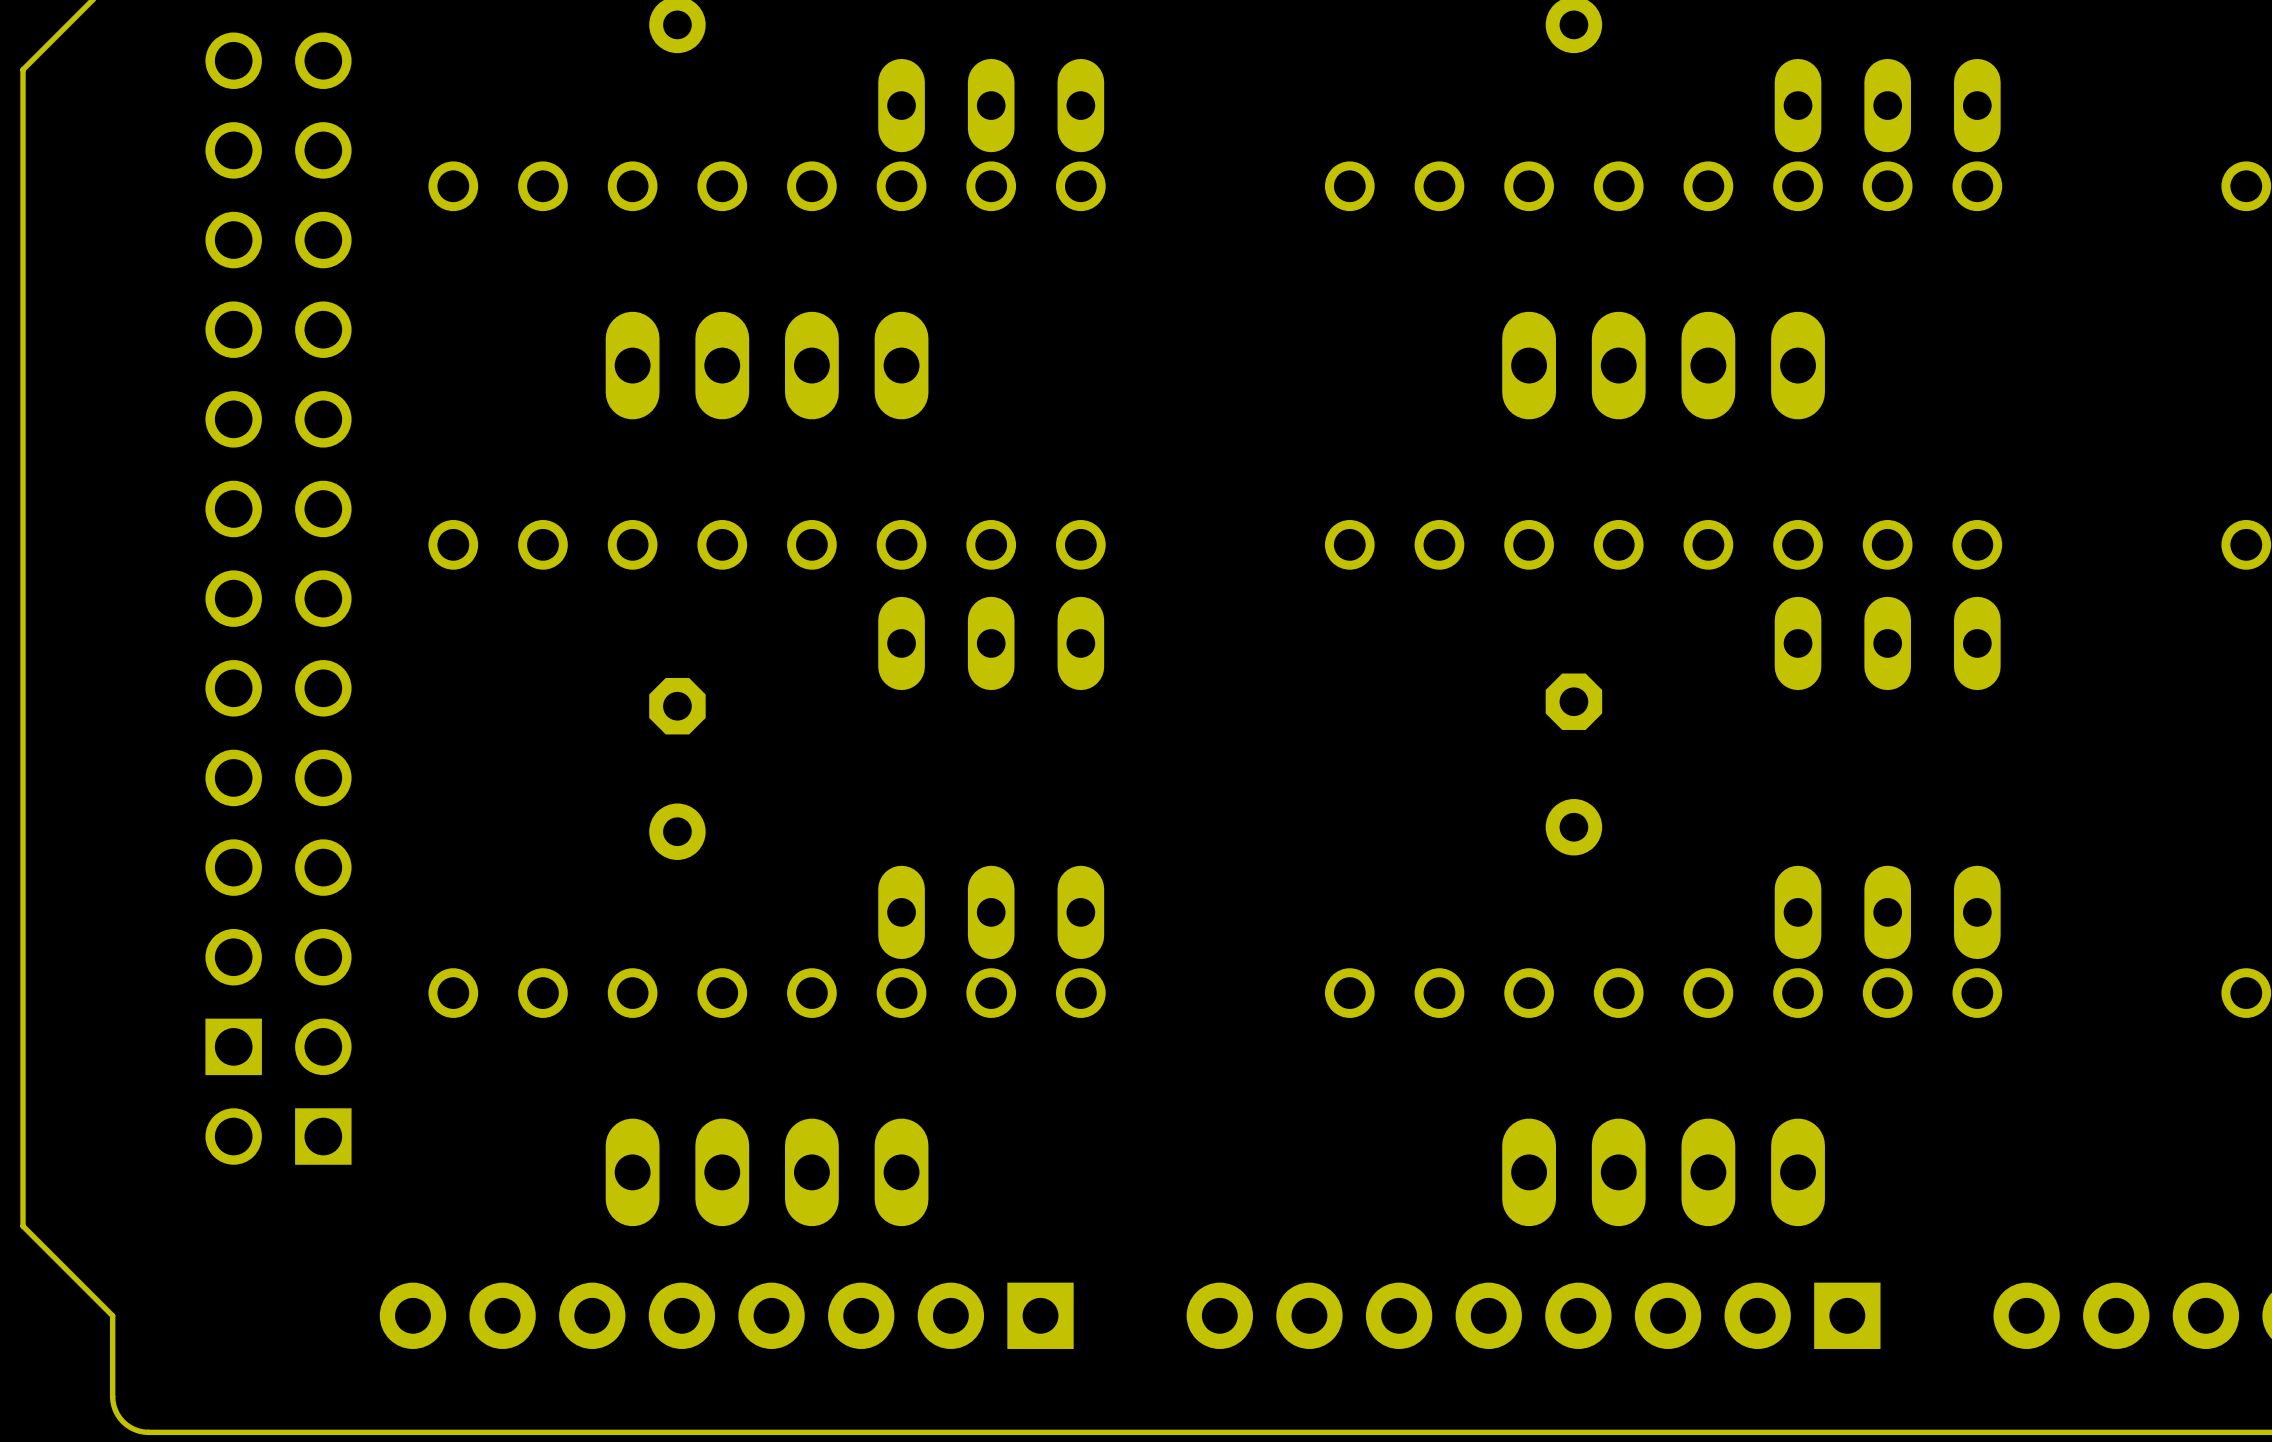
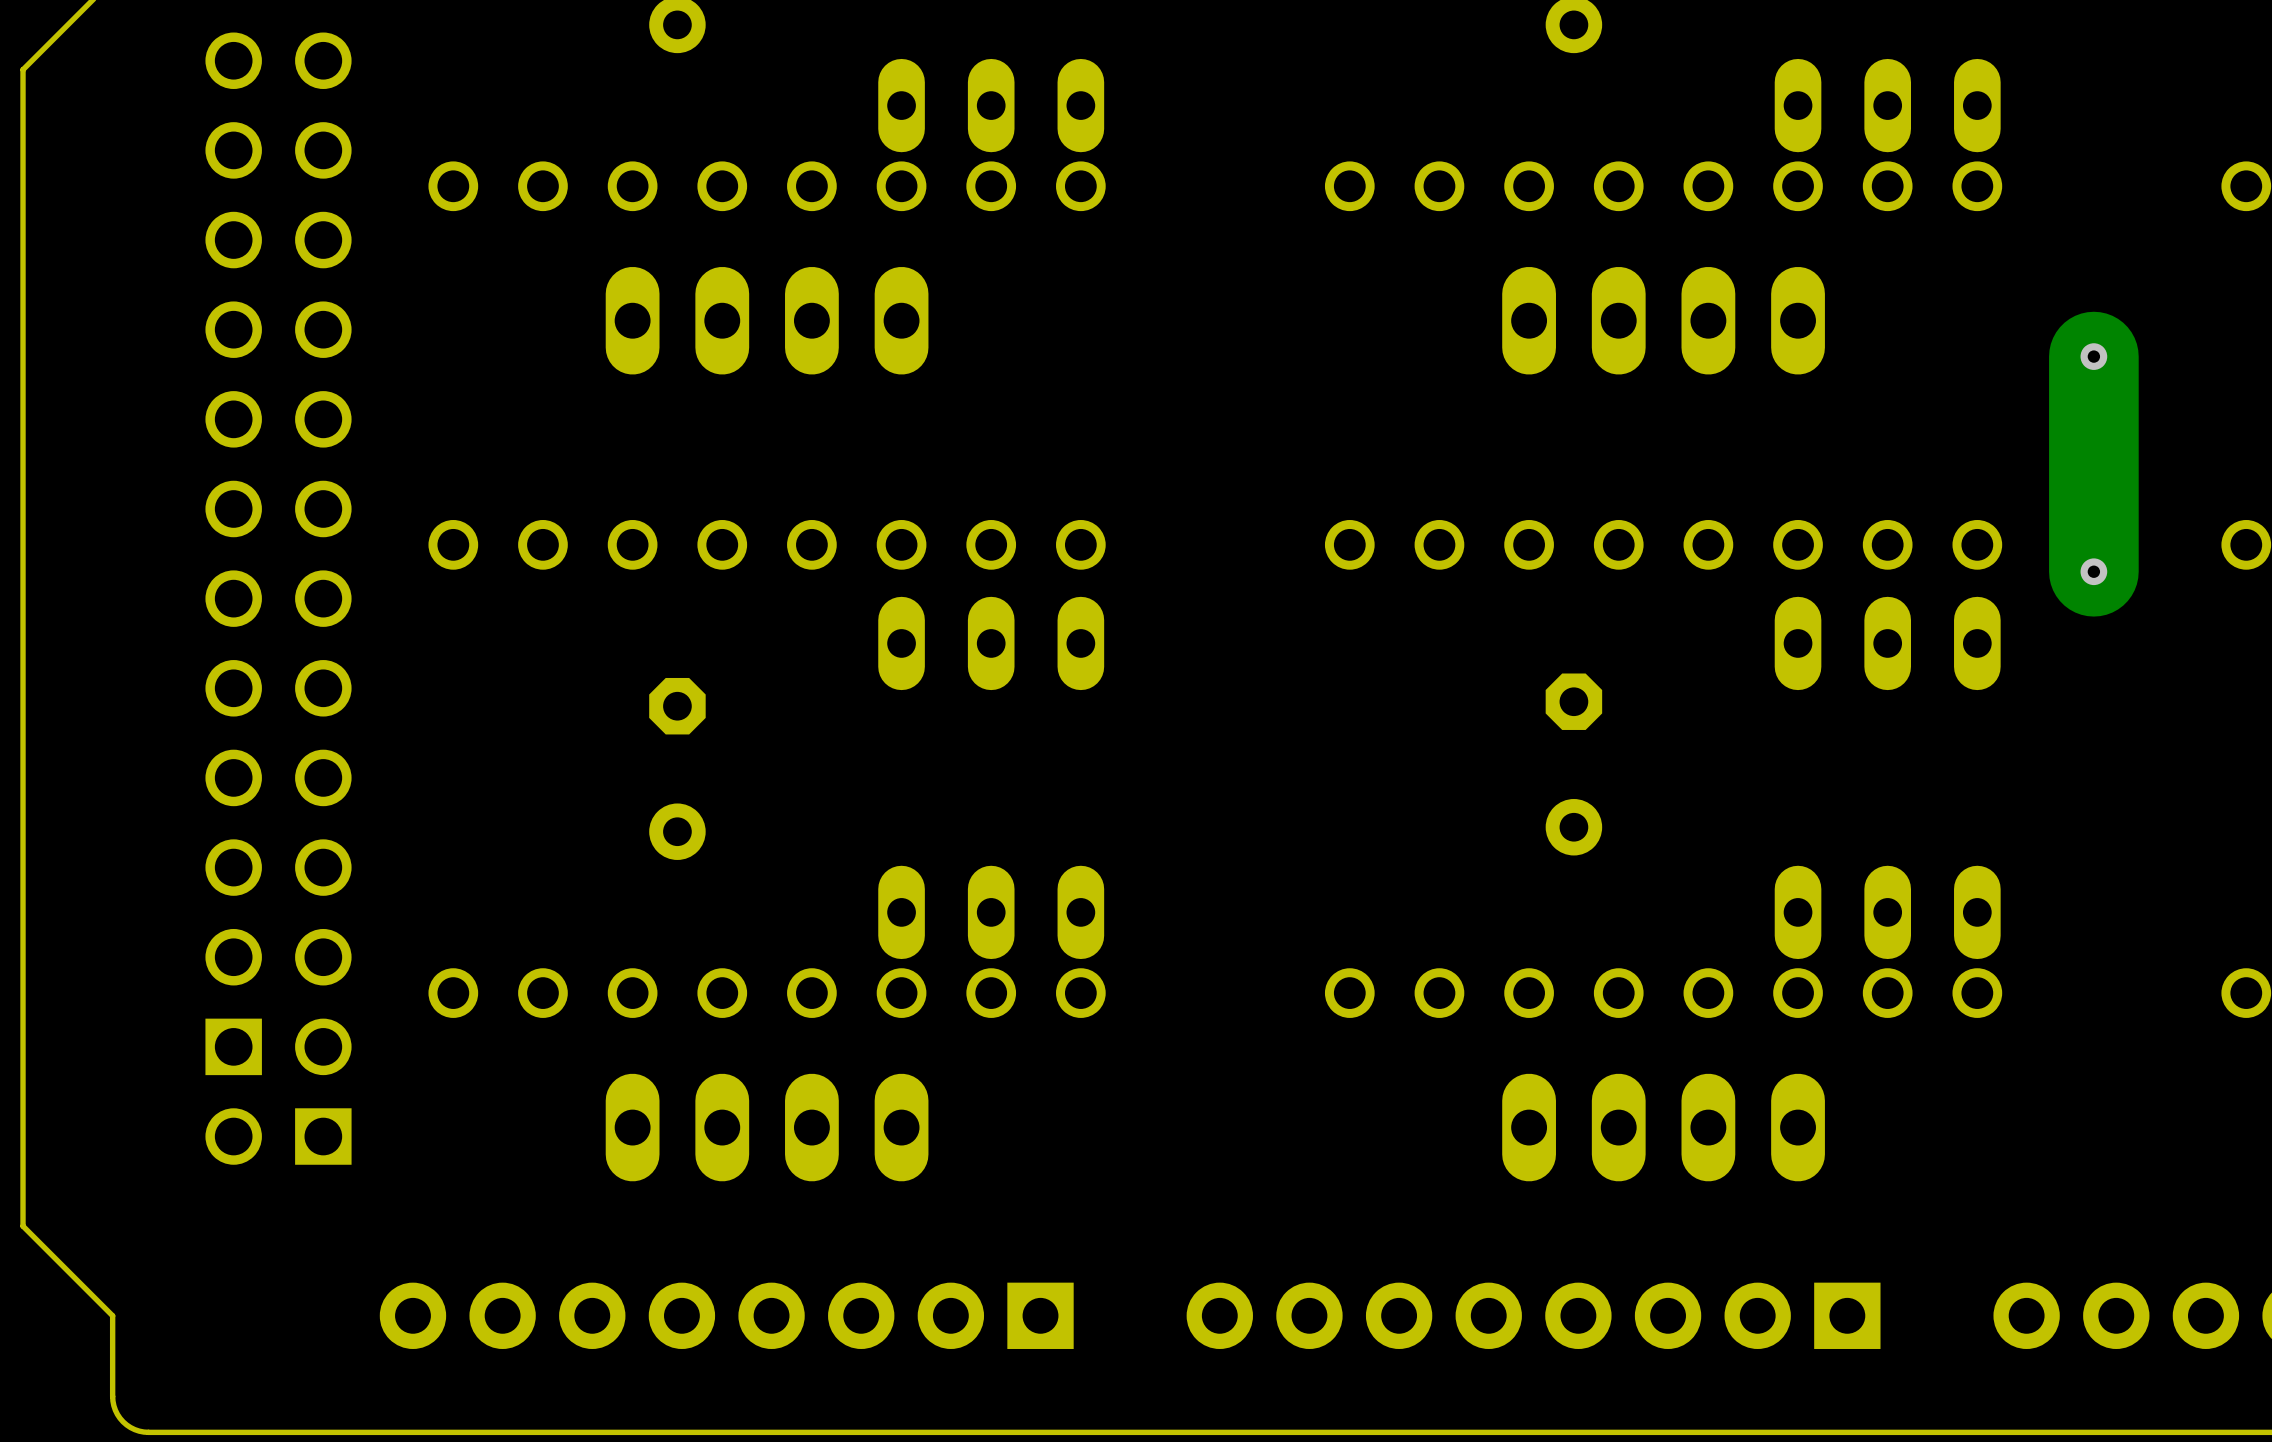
track: none -> (2093, 356) (2093, 571)
via: none -> (2093, 356)
part position: (767, 365) -> (767, 320)
part position: (1663, 365) -> (1663, 320)
via: none -> (2093, 571)
part position: (767, 1172) -> (767, 1127)
part position: (1663, 1172) -> (1663, 1127)

